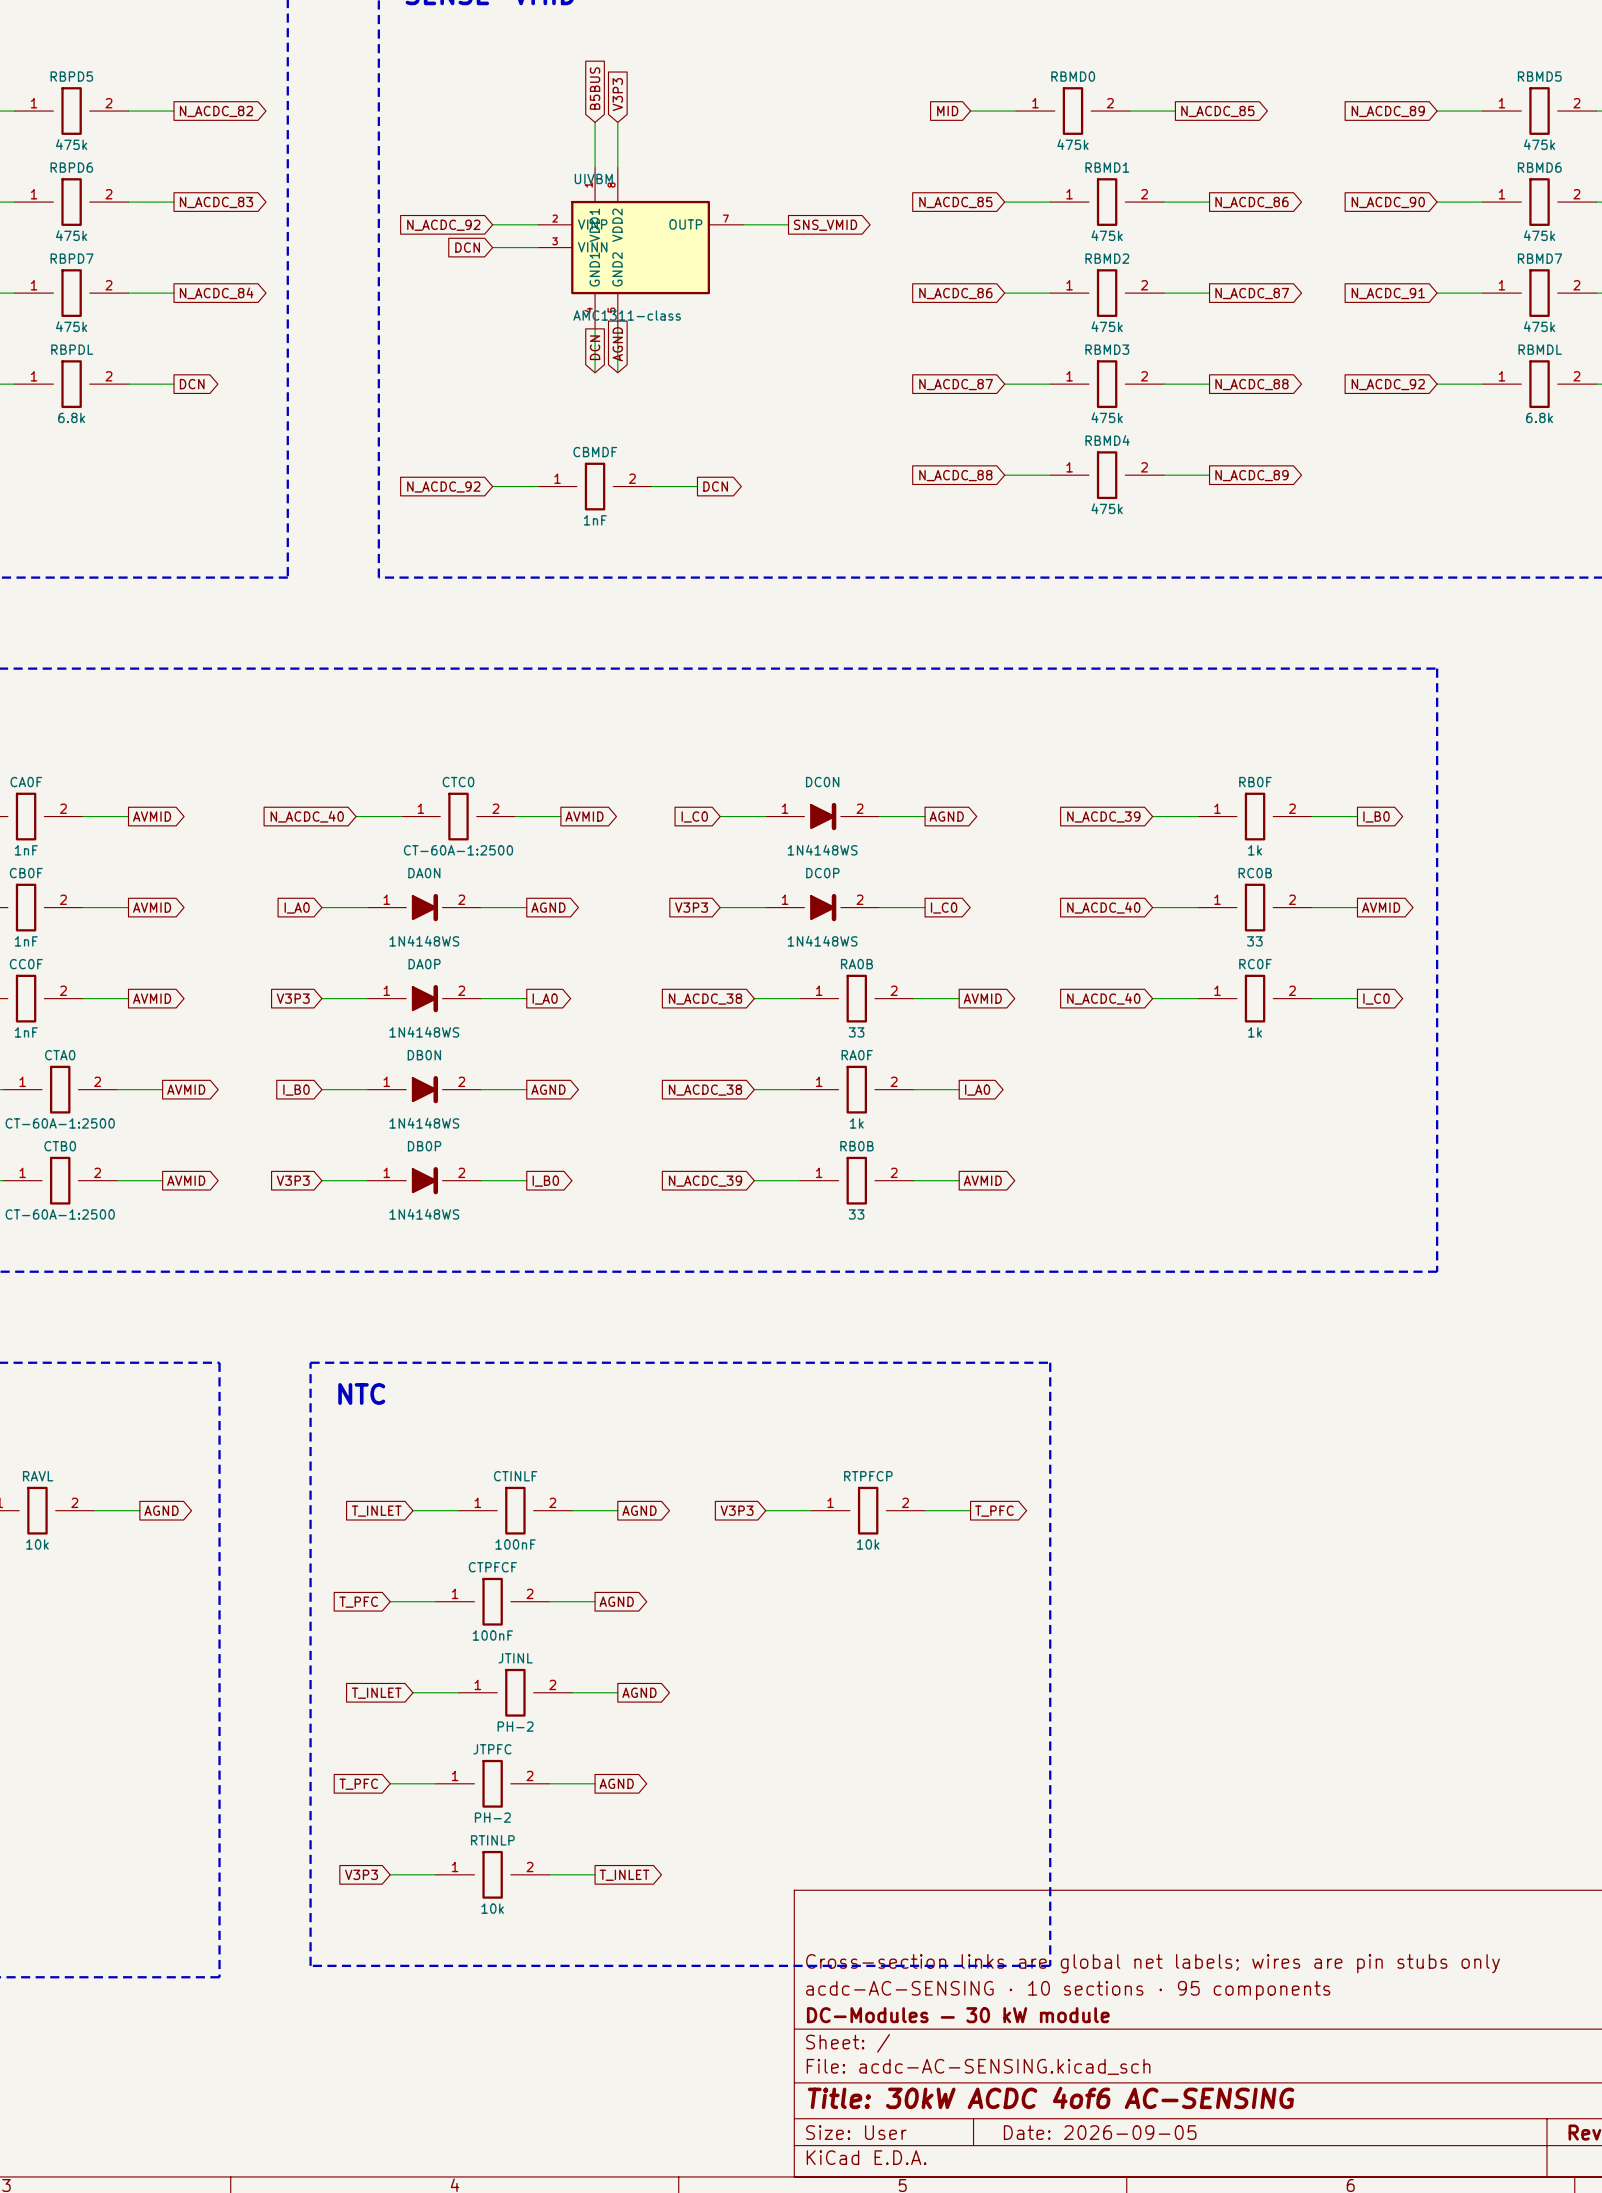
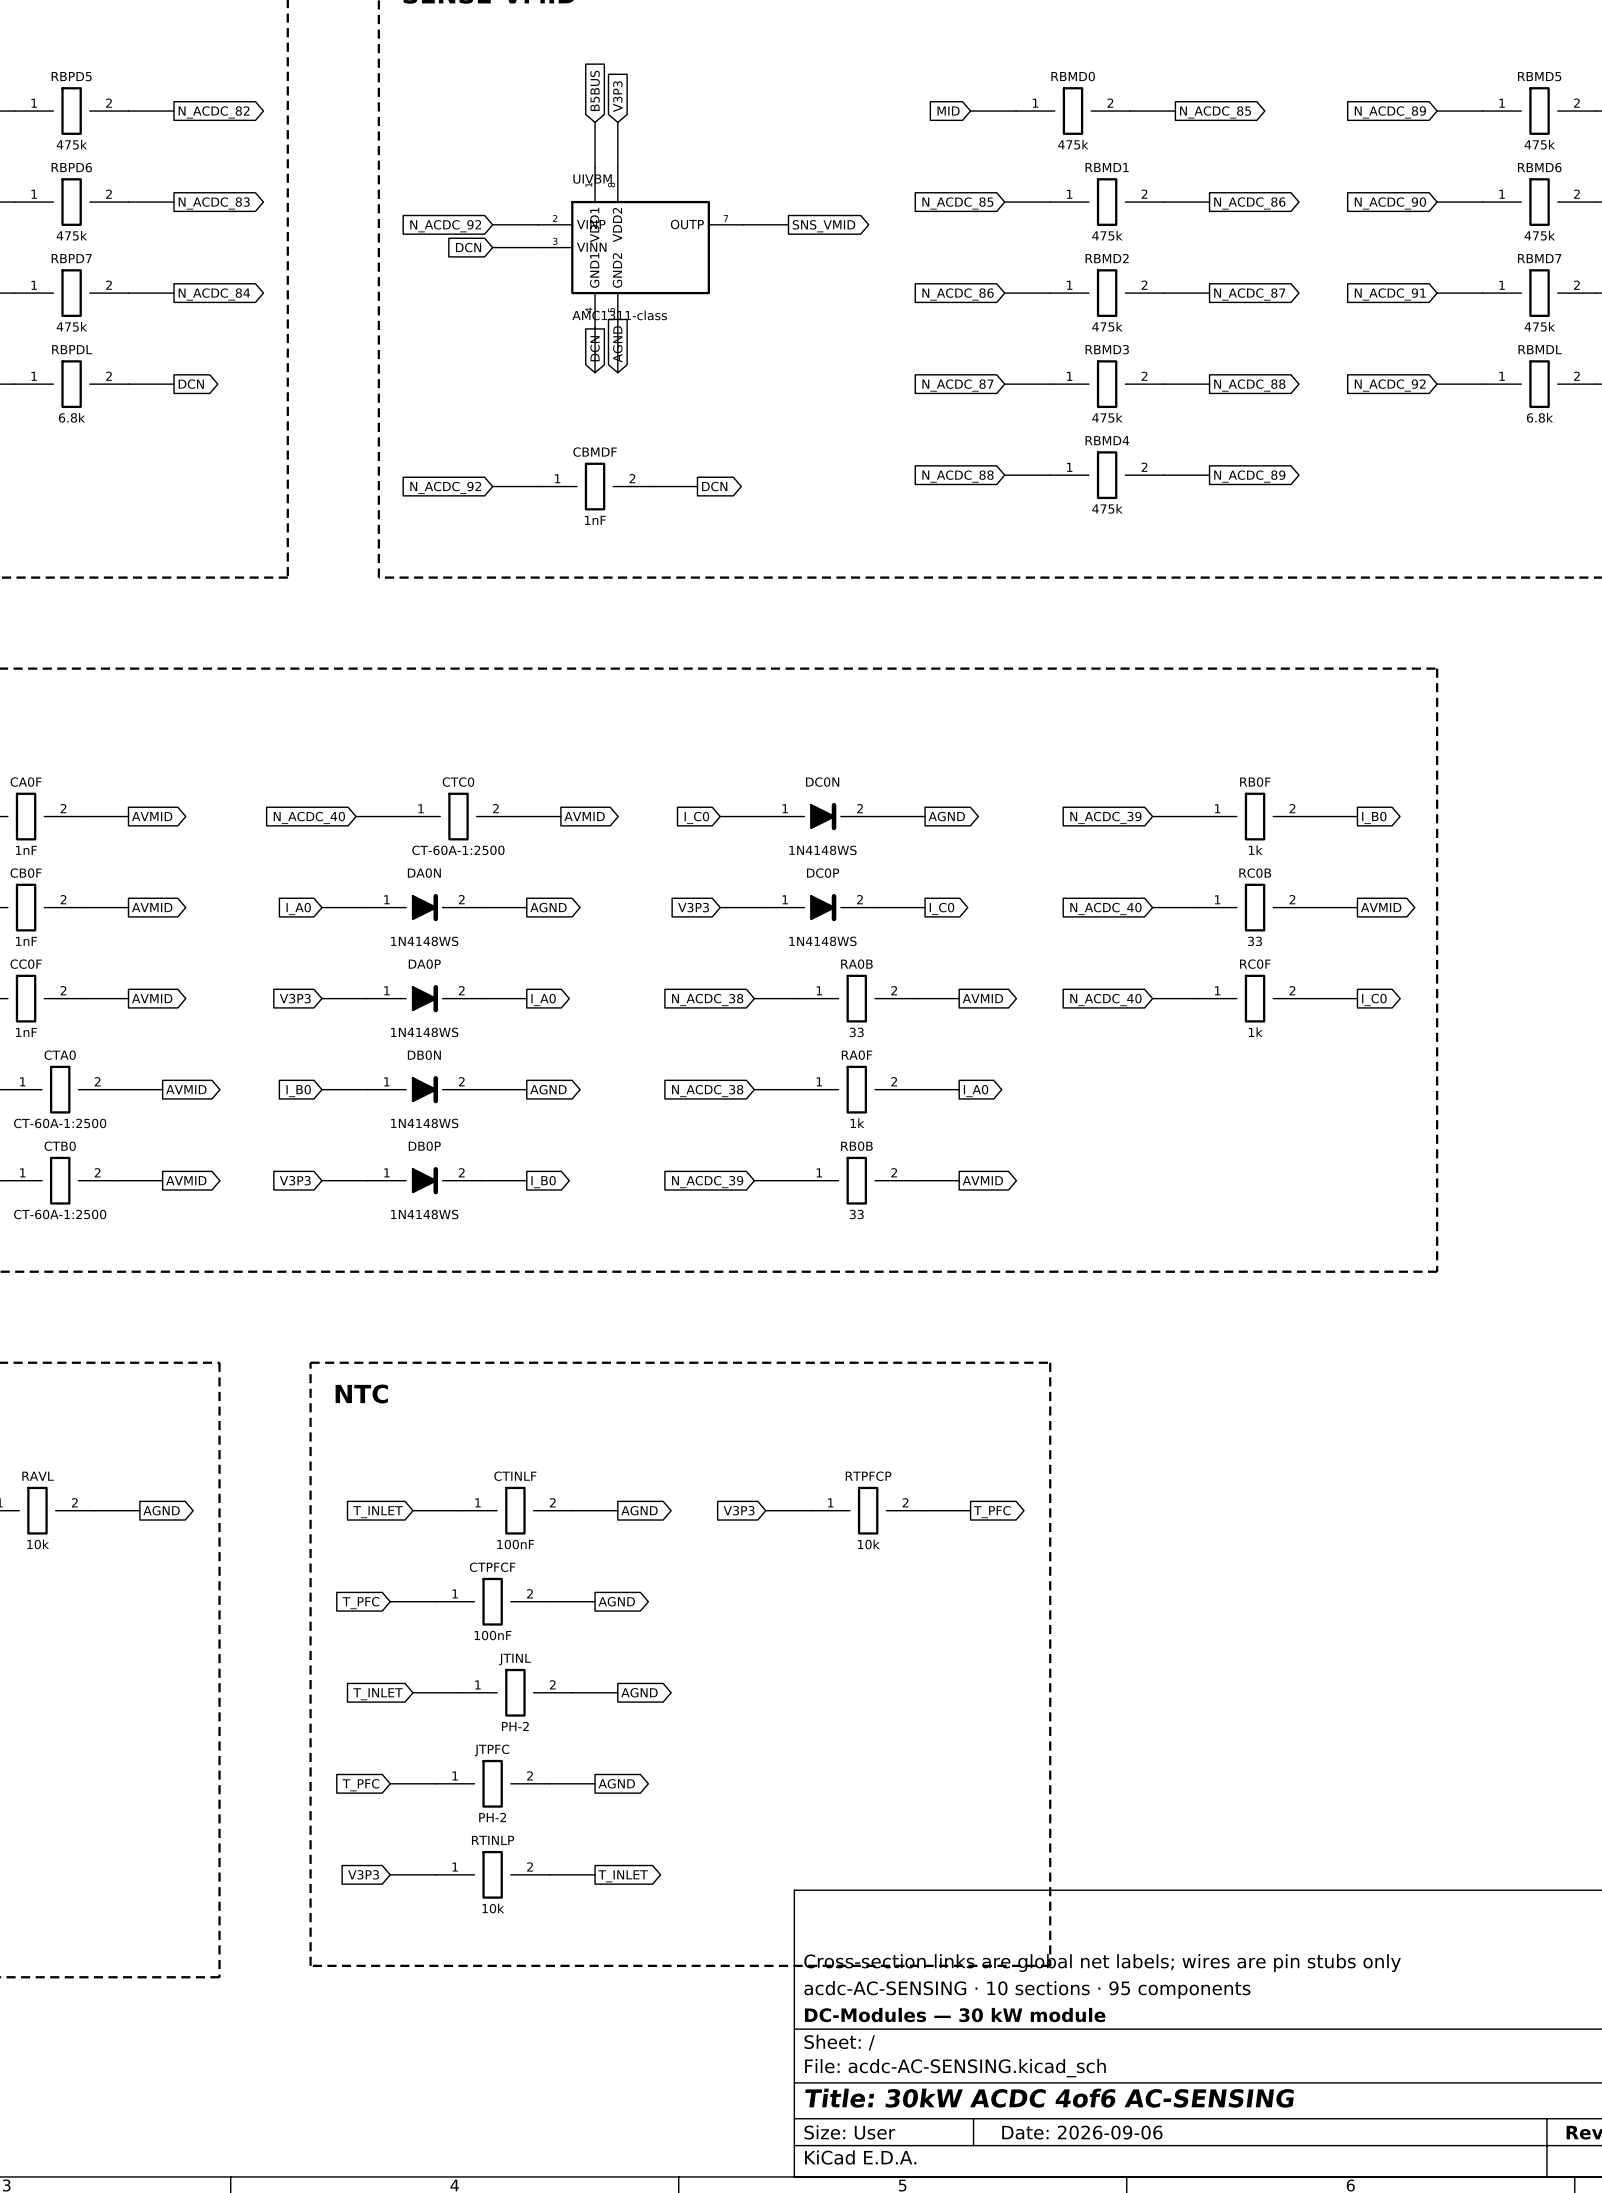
title block: Date: 2026-09-05 (1100, 2132) -> Date: 2026-09-06 (1082, 2132)

